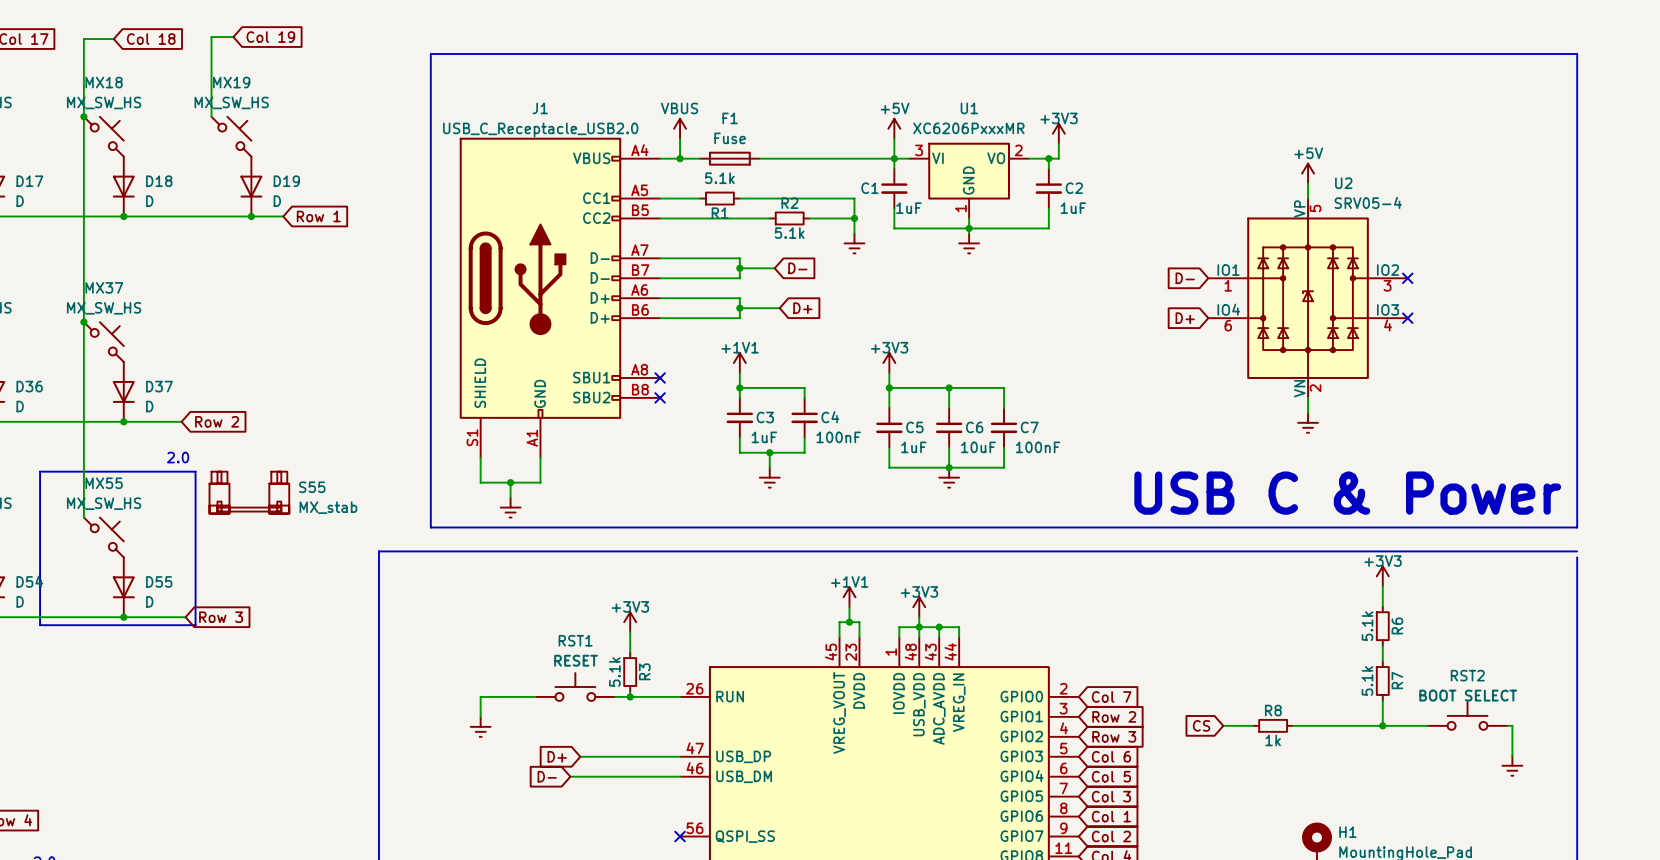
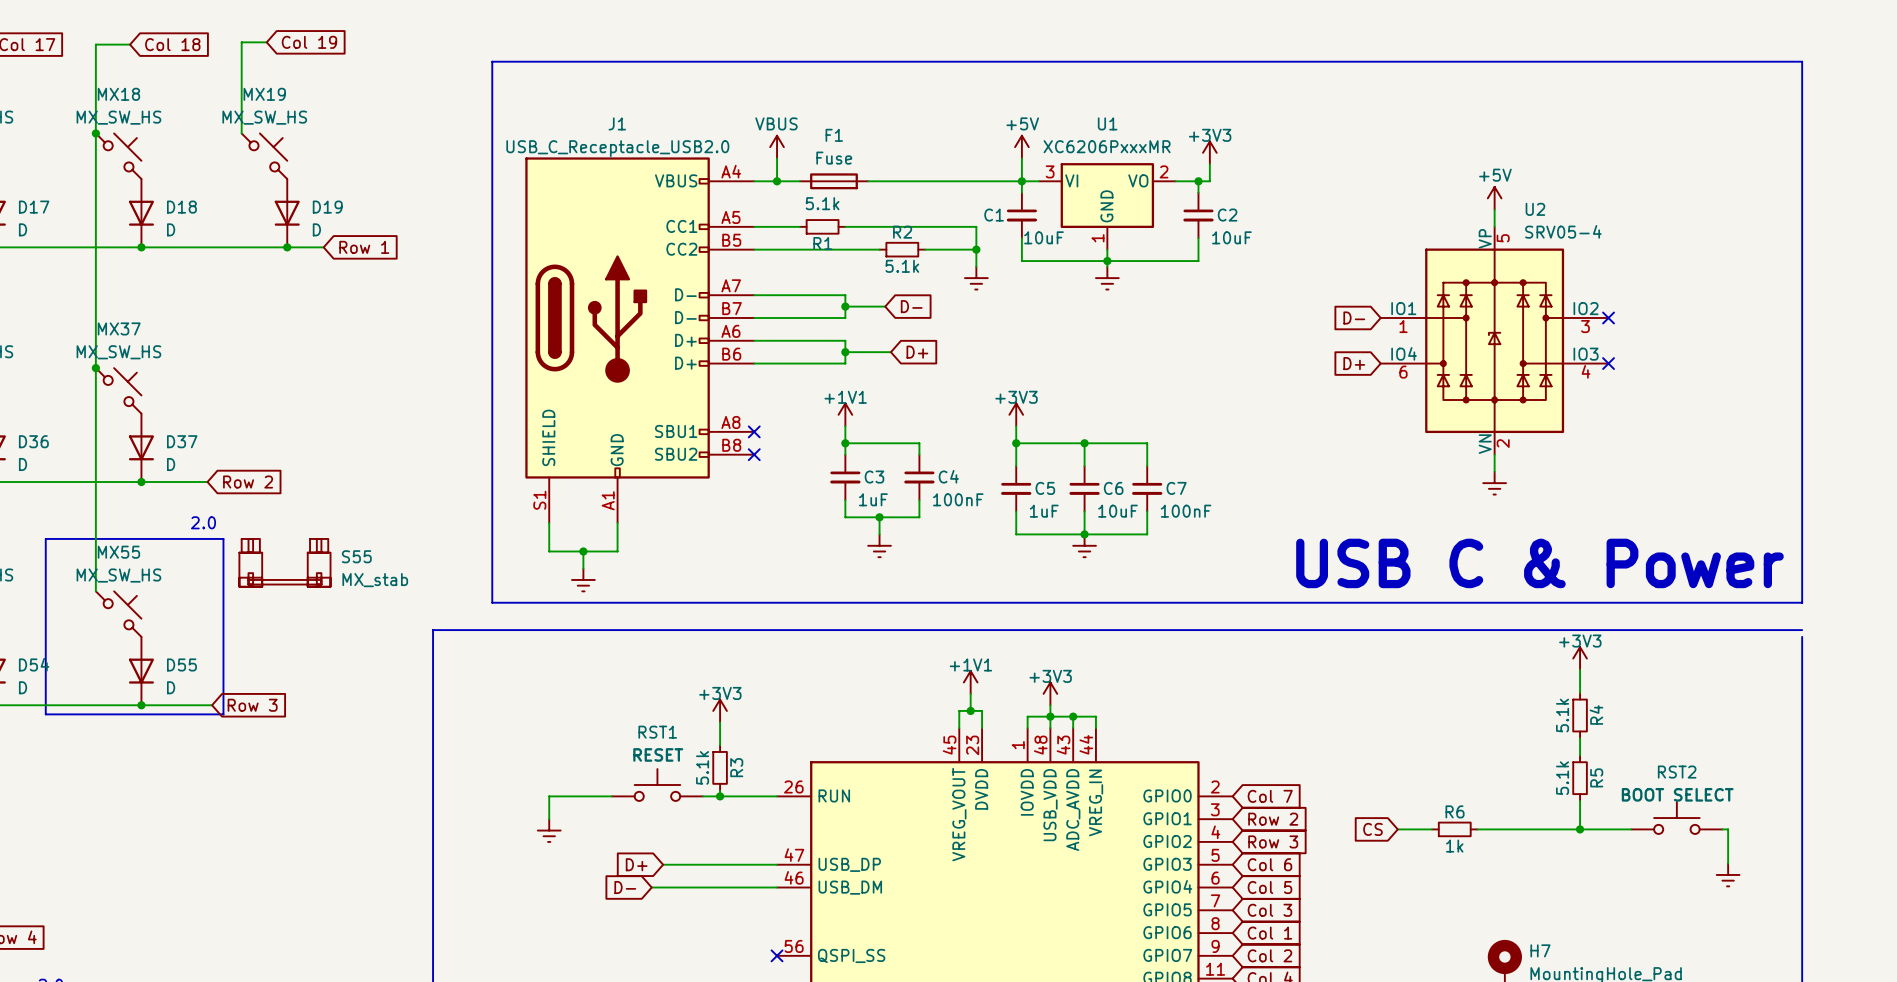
C1 value: 1uF (908, 208) -> 10uF (1043, 237)
C2 value: 1uF (1073, 208) -> 10uF (1231, 237)
R6 name: R6 (1397, 625) -> R4 (1596, 714)
R7 name: R7 (1397, 680) -> R5 (1596, 777)
R8 name: R8 (1273, 710) -> R6 (1455, 811)
H1 name: H1 (1347, 832) -> H7 (1540, 950)

